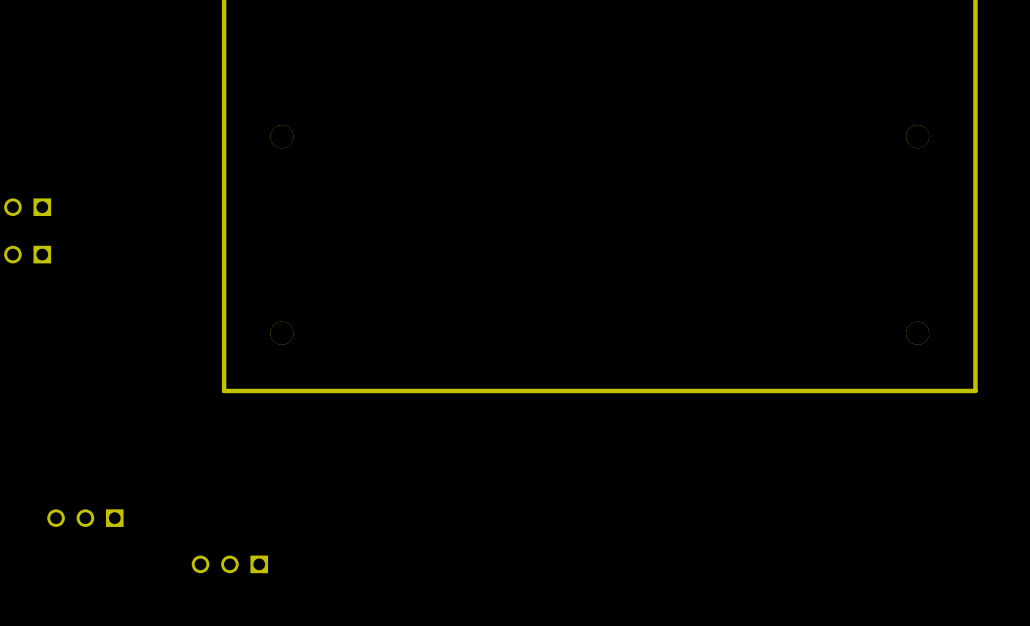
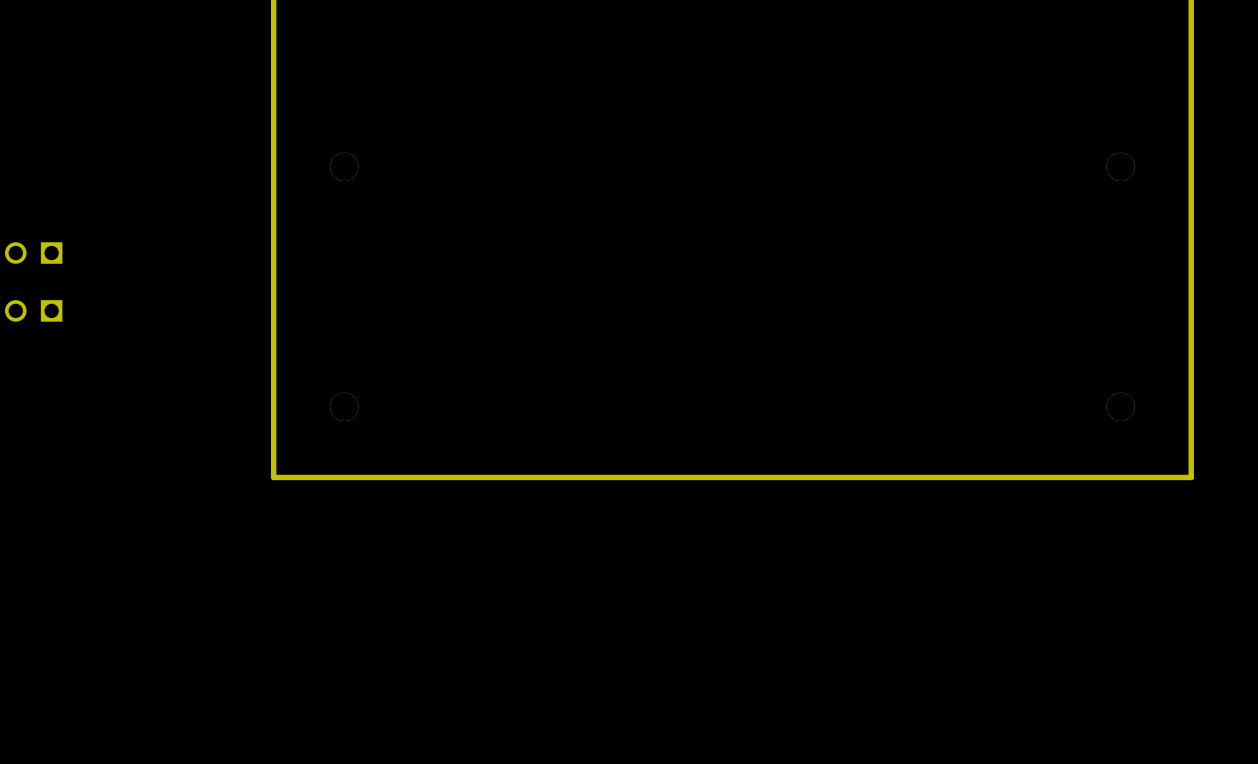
part: (85, 518) -> none
part: (229, 564) -> none

